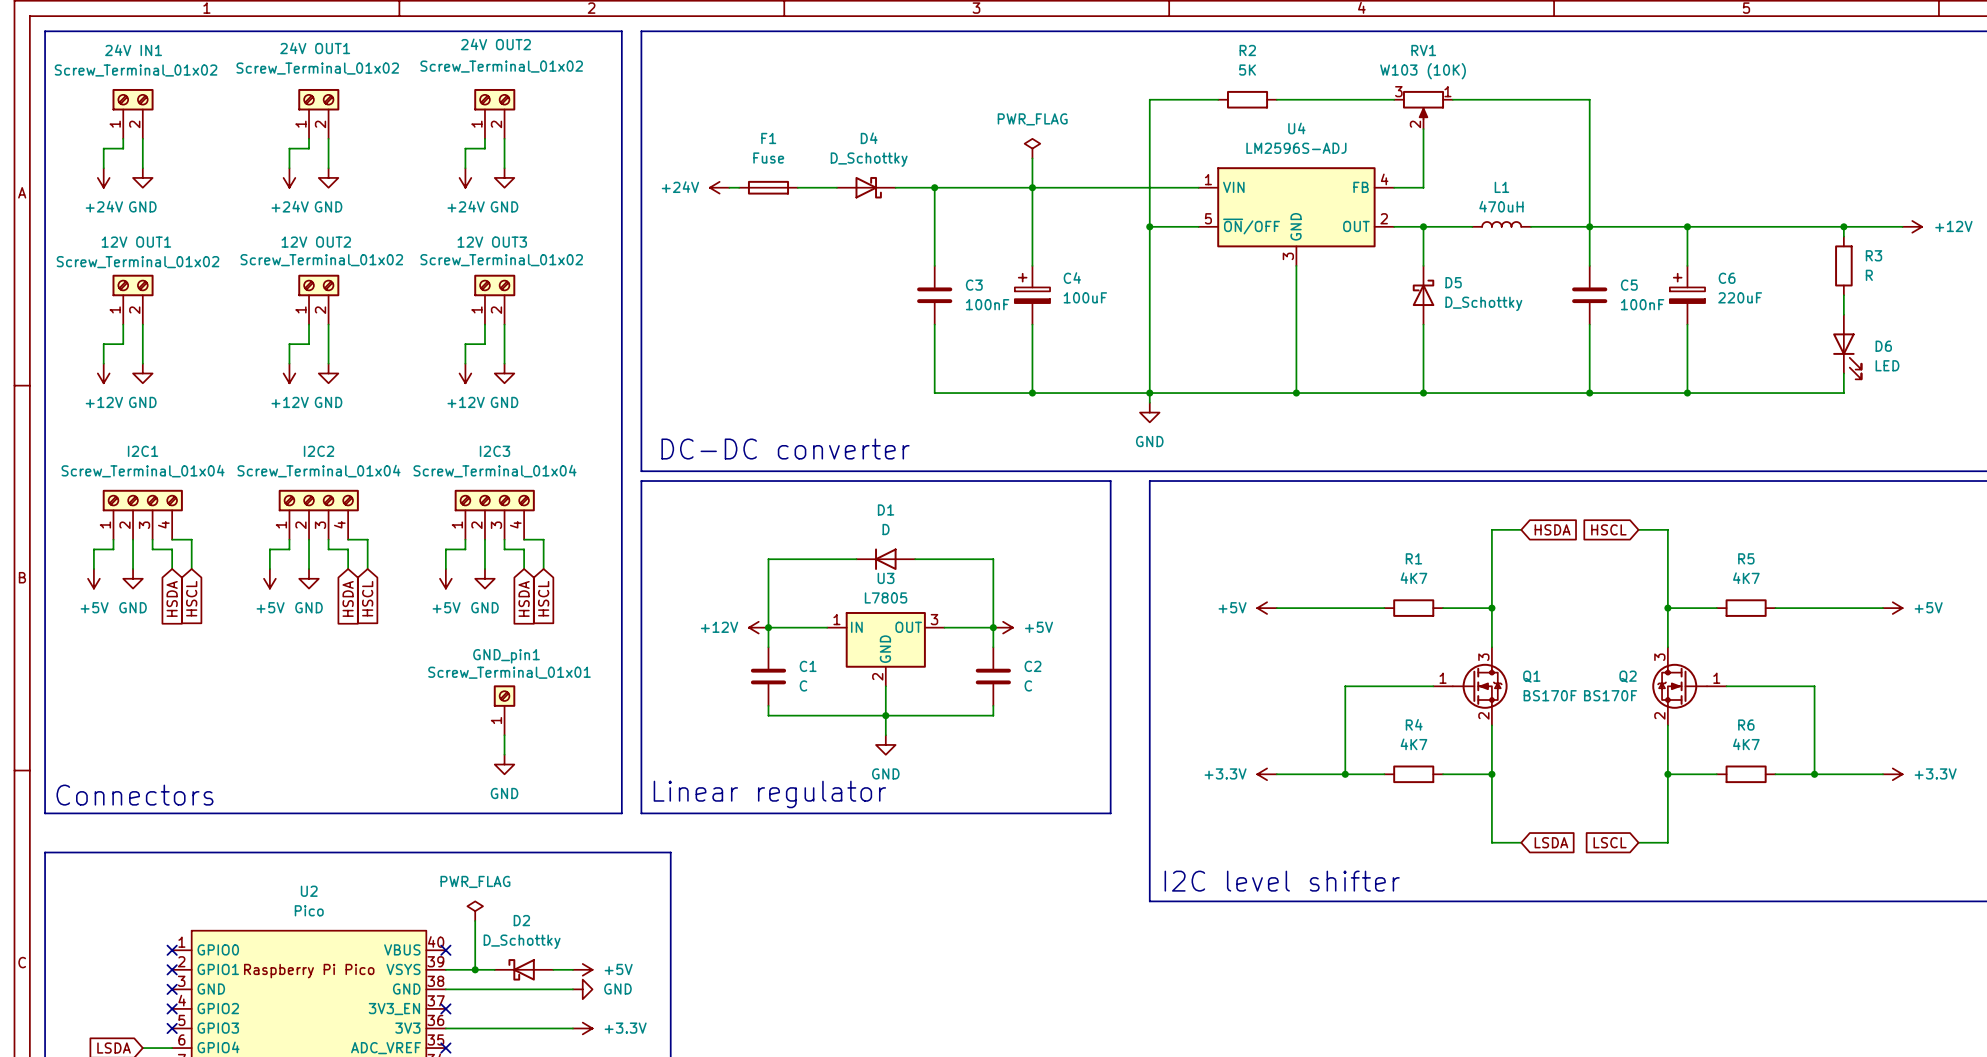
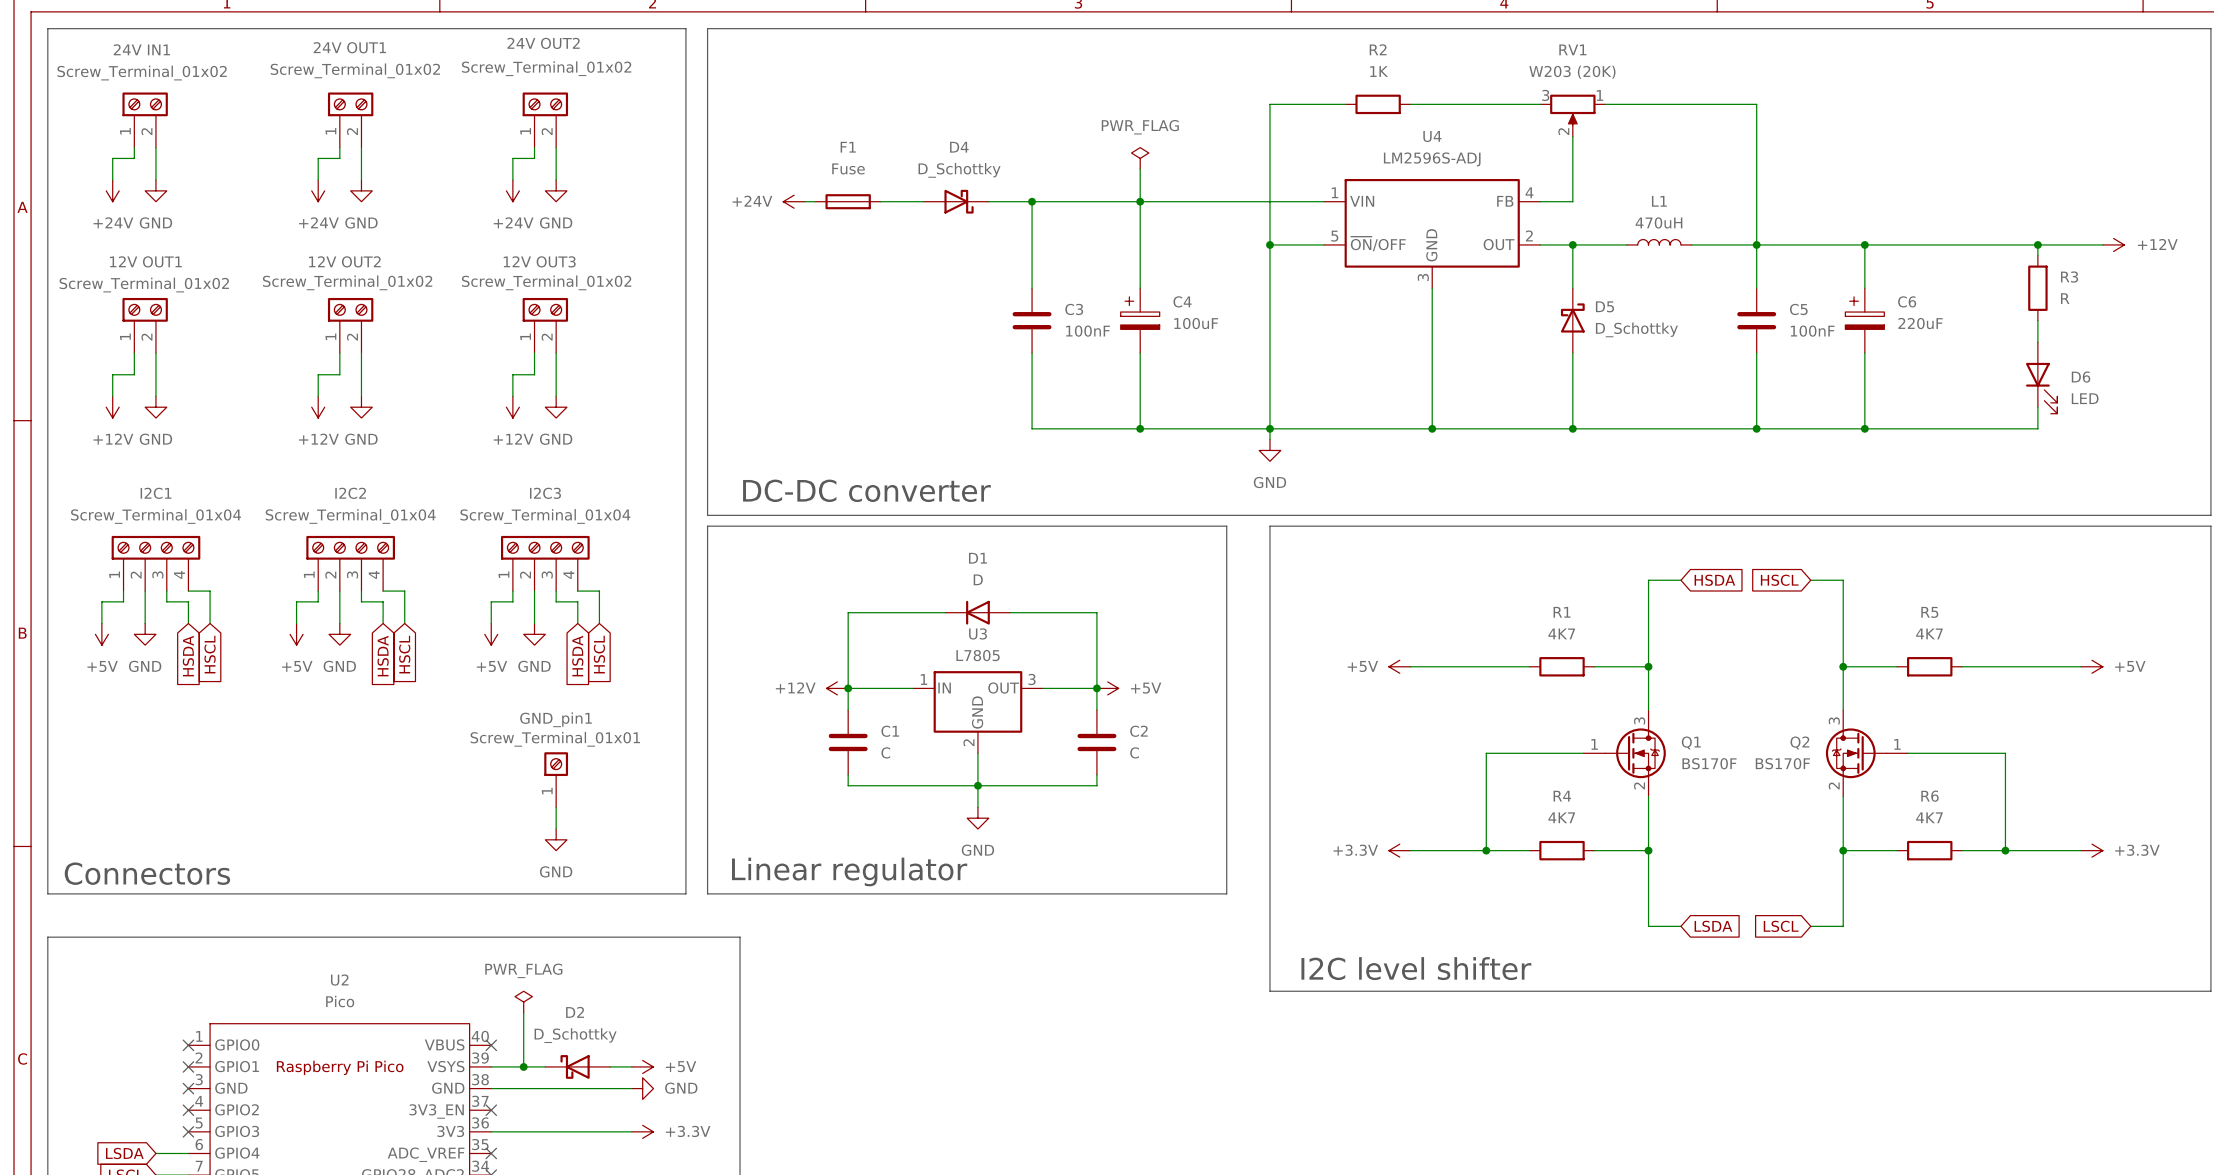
R2 value: 5K (1247, 70) -> 1K (1379, 71)
RV1 value: W103 (10K) (1423, 71) -> W203 (20K) (1572, 72)

